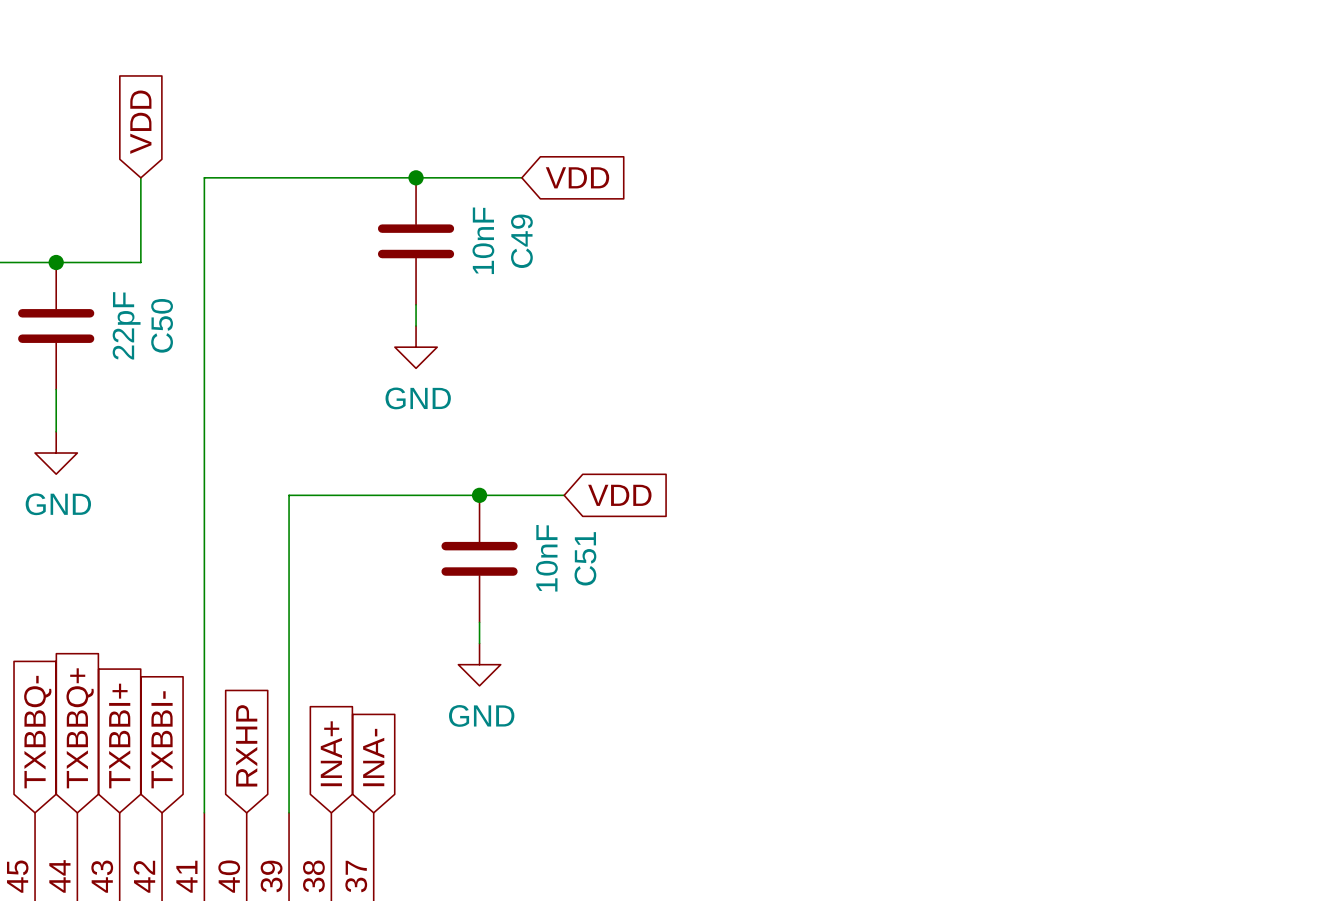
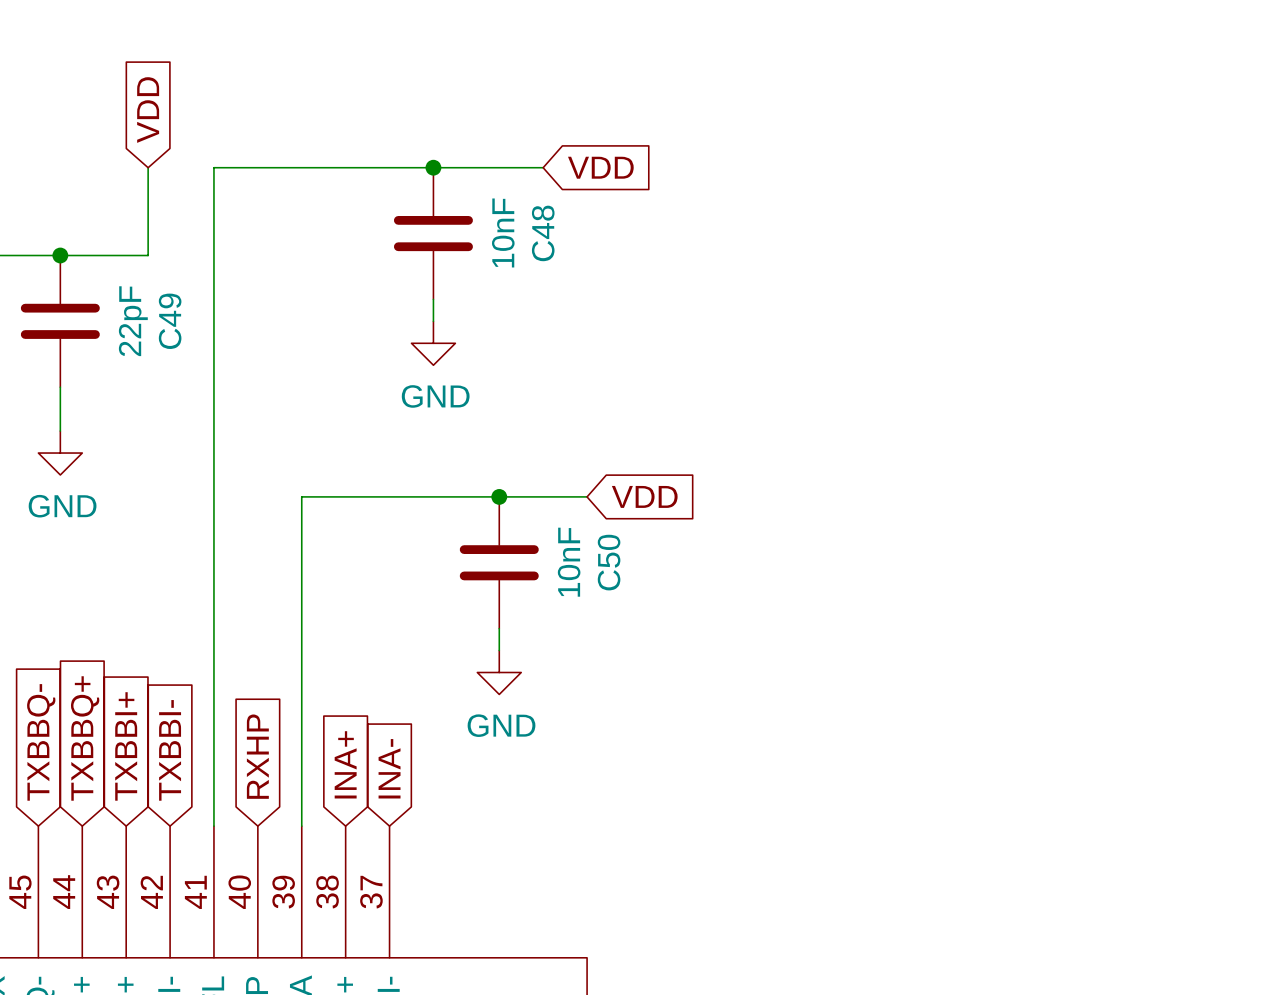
C49 name: C49 (521, 241) -> C48 (543, 233)
C50 name: C50 (162, 325) -> C49 (170, 321)
C51 name: C51 (585, 558) -> C50 (609, 562)

